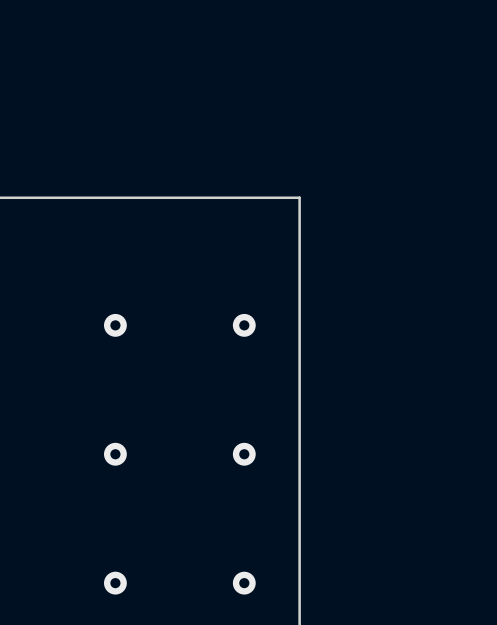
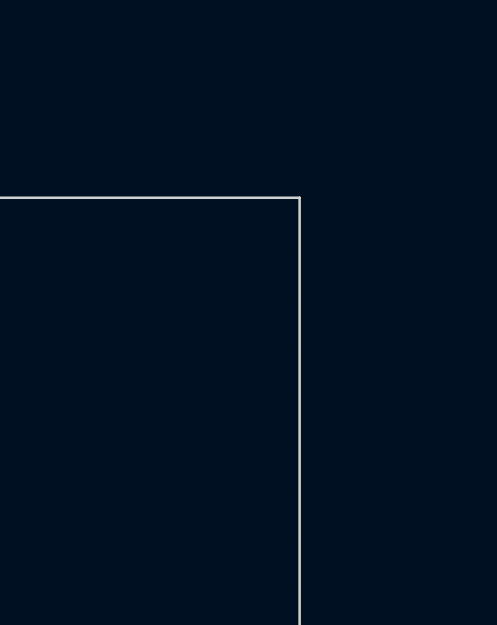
via: (115, 325) -> none
via: (244, 325) -> none
via: (115, 454) -> none
via: (244, 454) -> none
via: (115, 583) -> none
via: (244, 583) -> none

